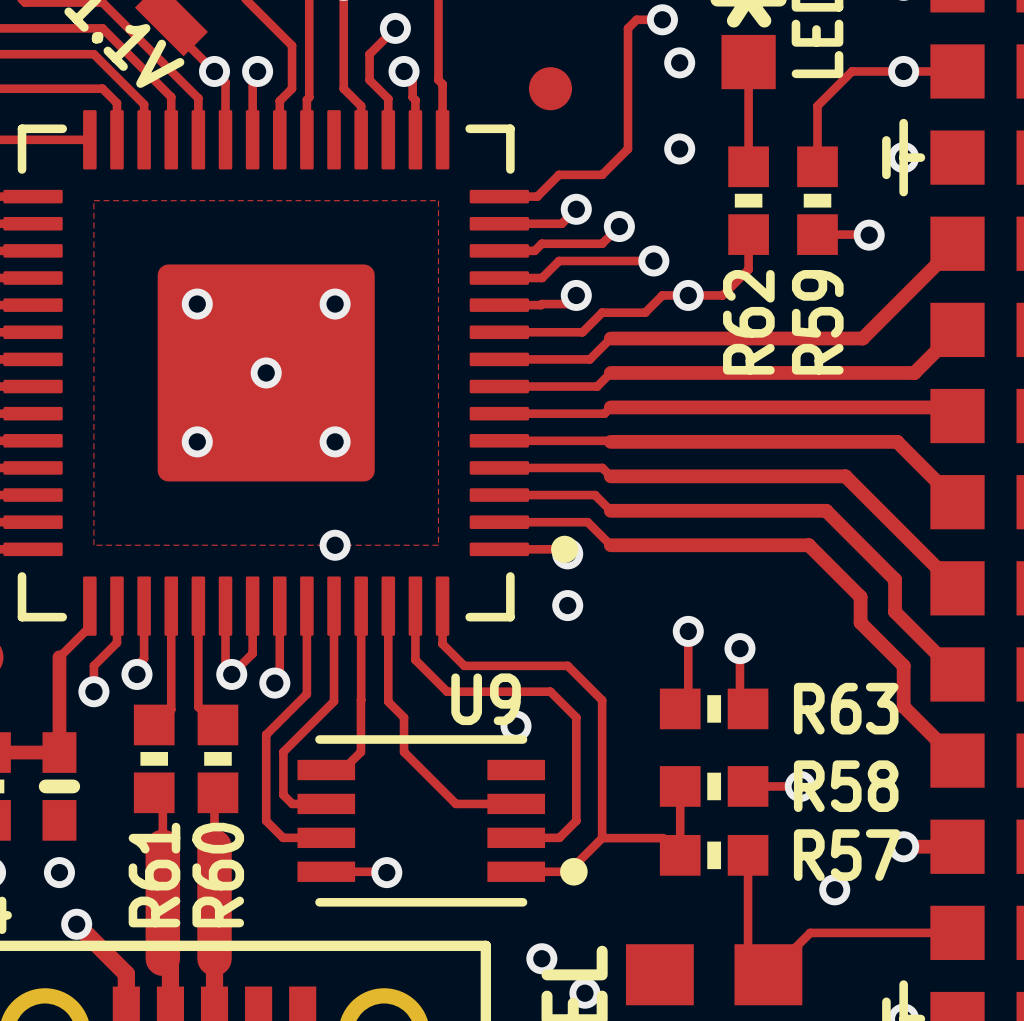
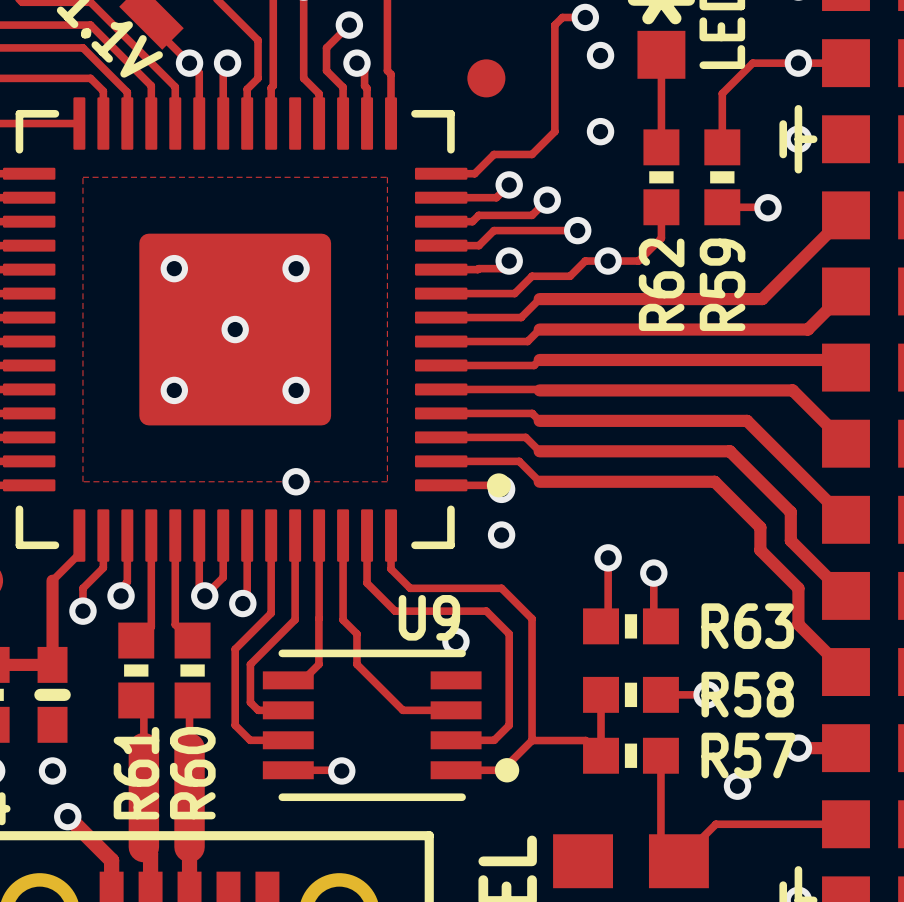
via: (541, 958) -> none
via: (584, 993) -> none

